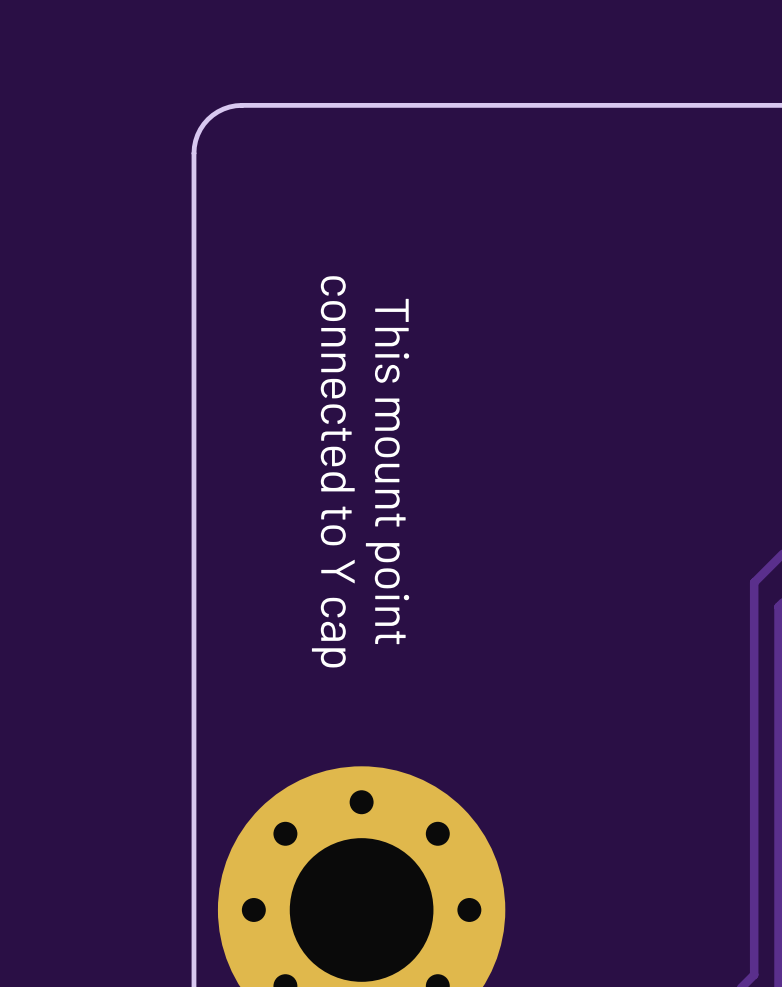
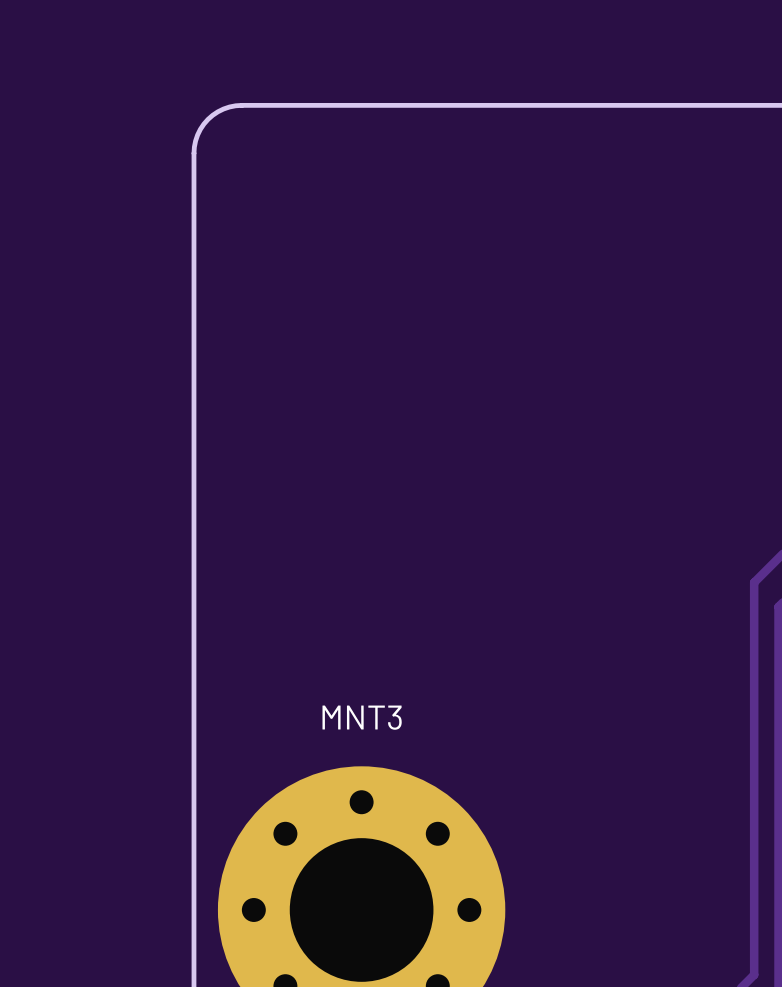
text: connected to Y cap (333, 471) -> none
text: This mount point (387, 471) -> none
MNT3 name: none -> MNT3 (362, 717)

